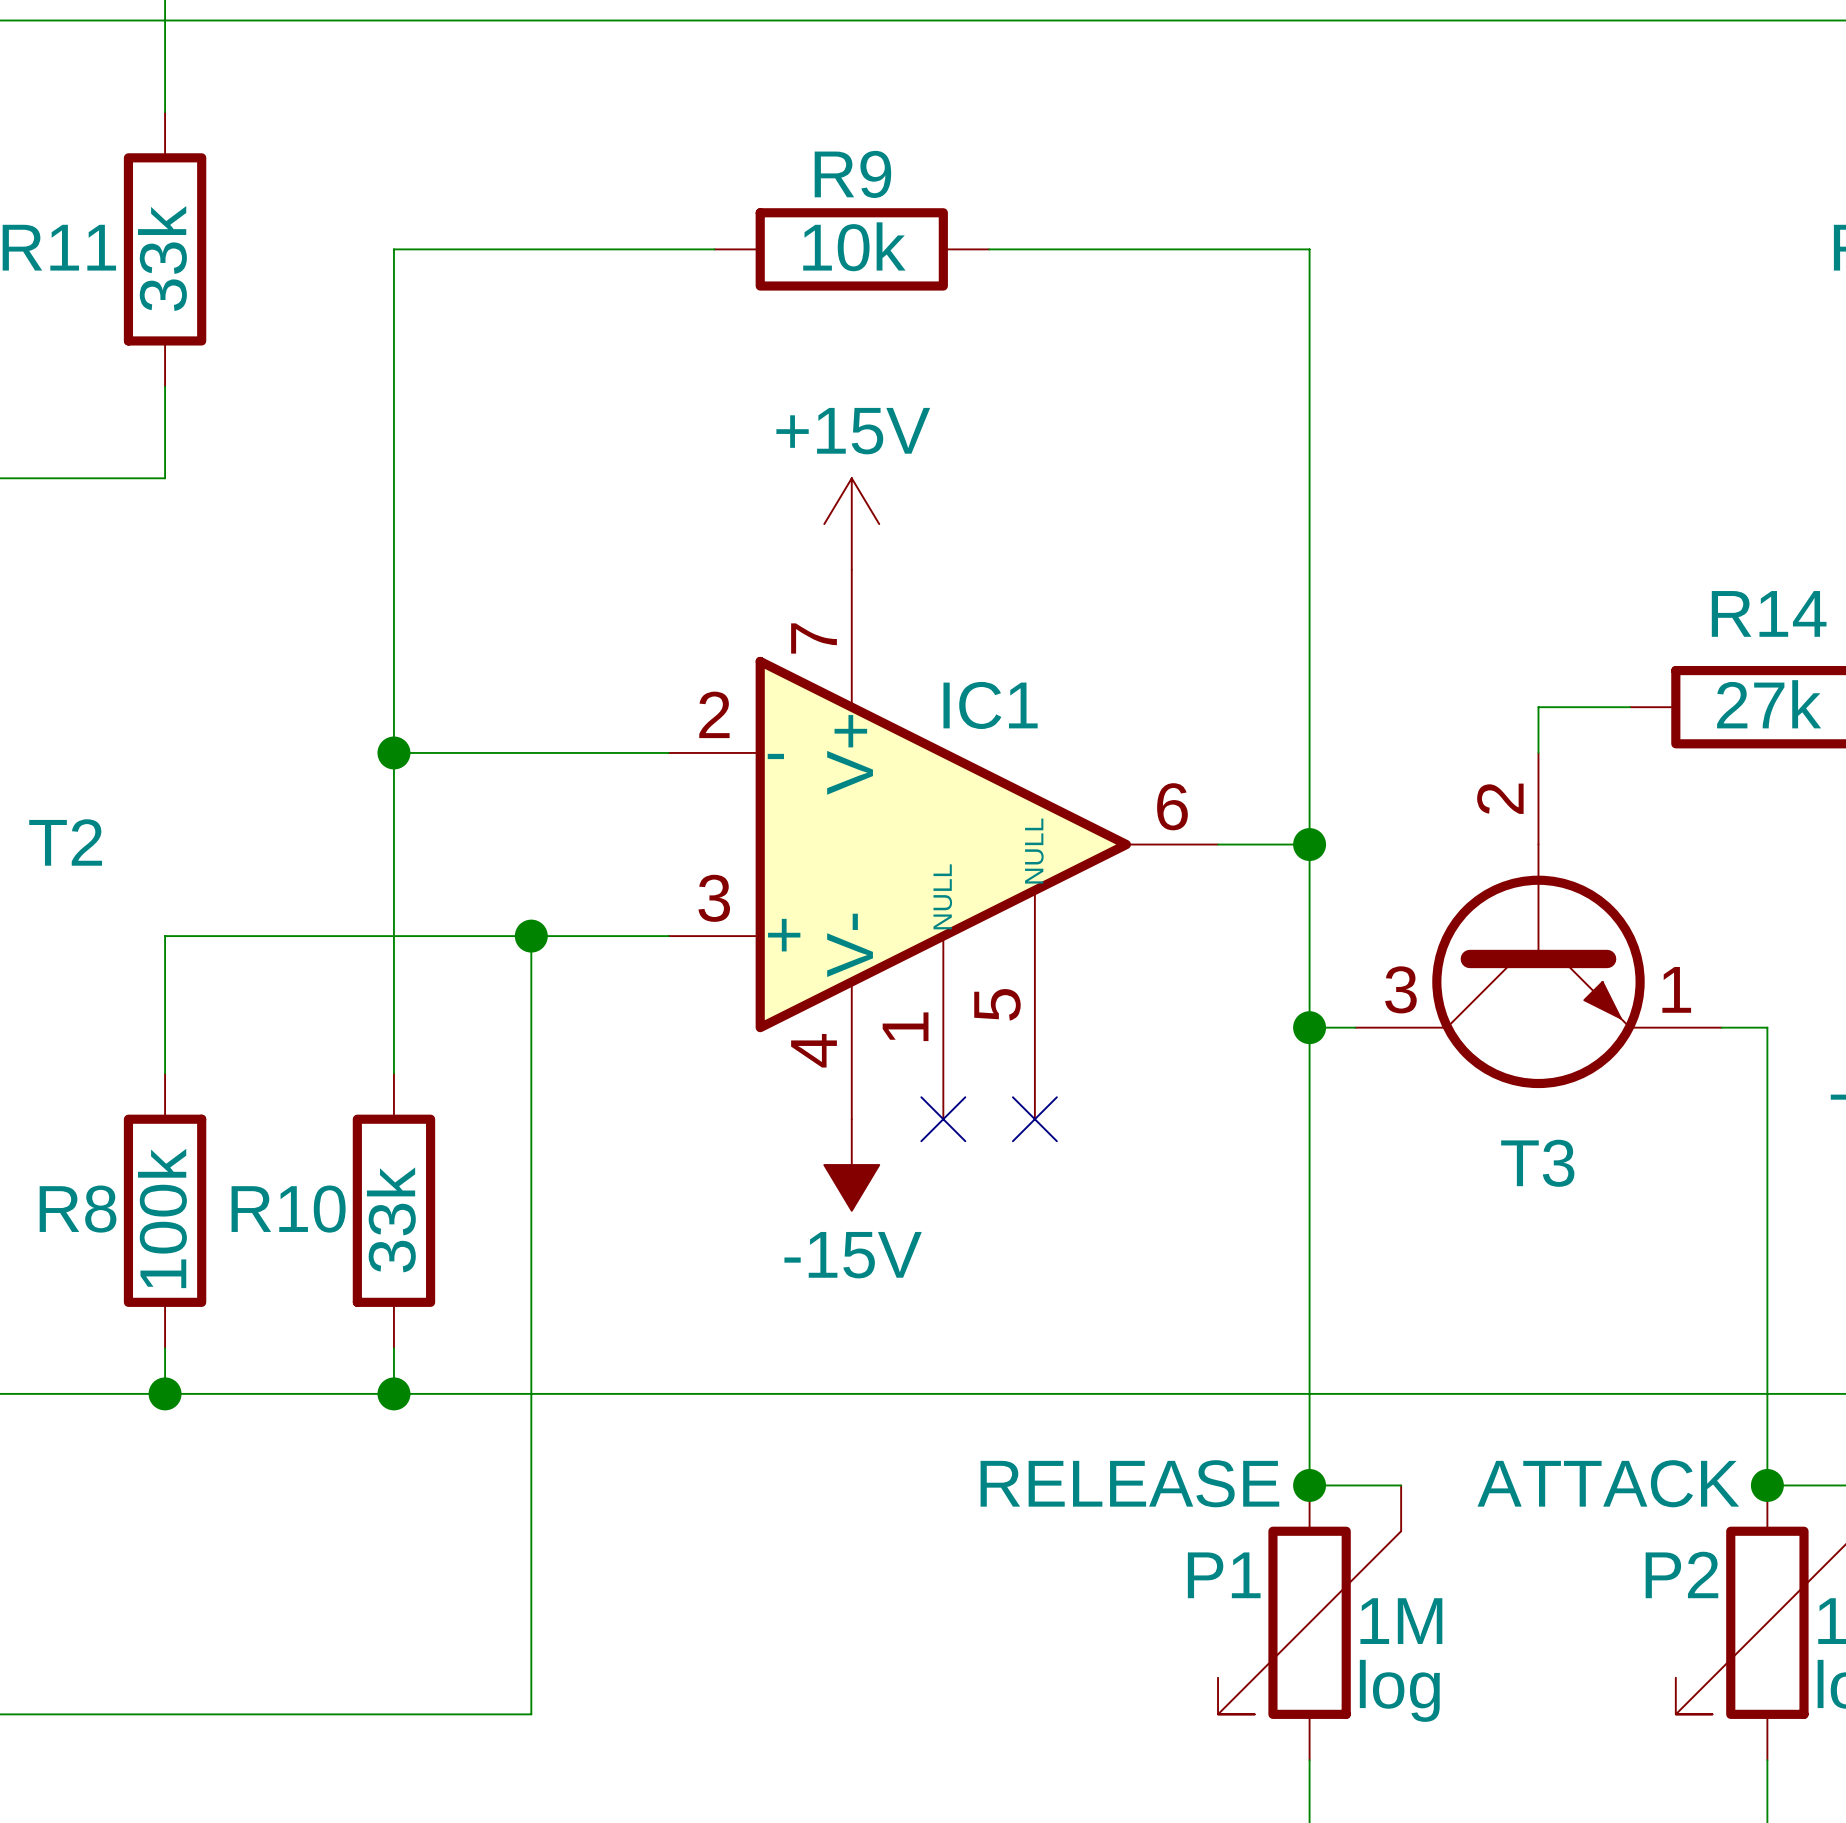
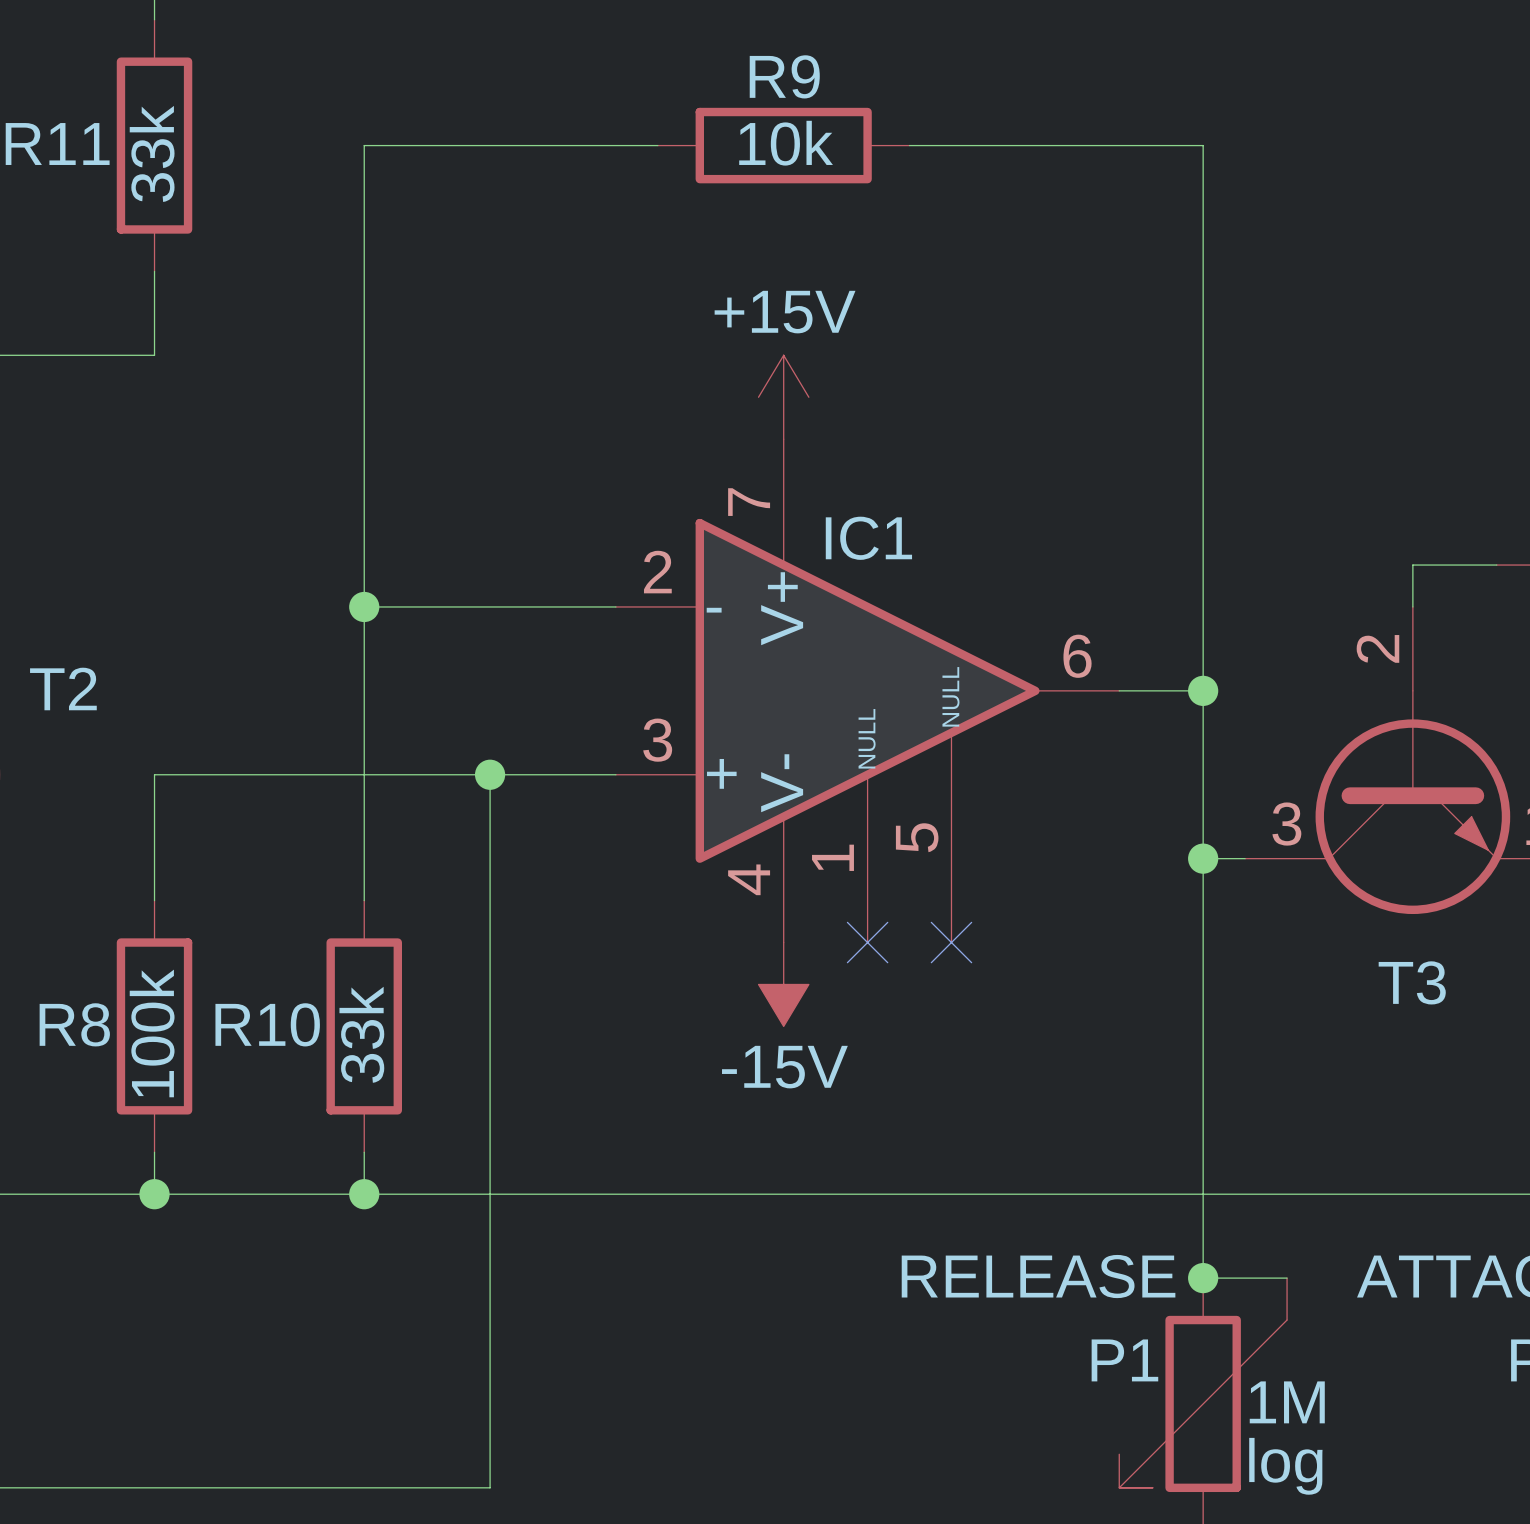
IC1 name position: IC1 (990, 705) -> IC1 (868, 538)

